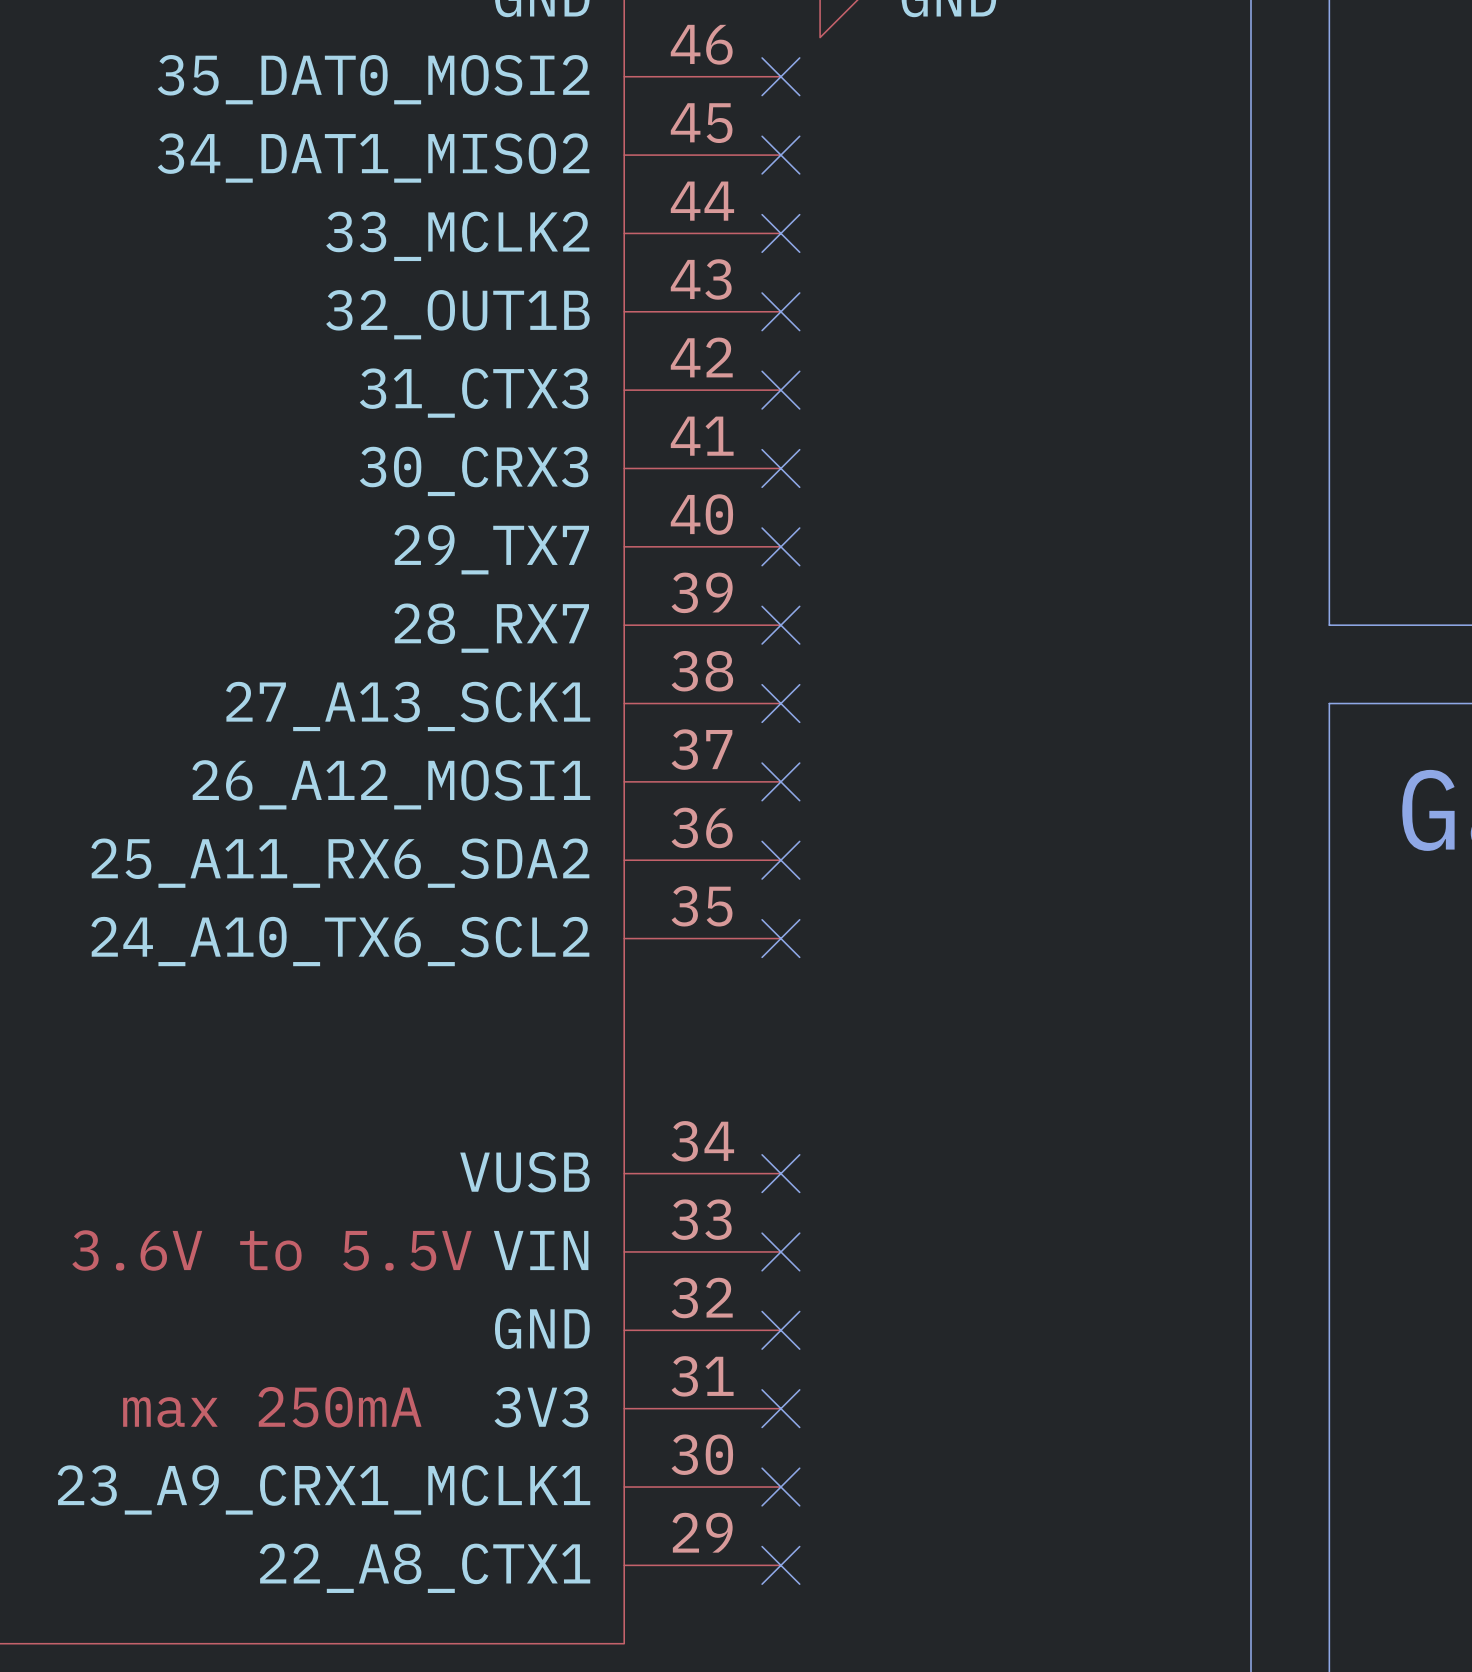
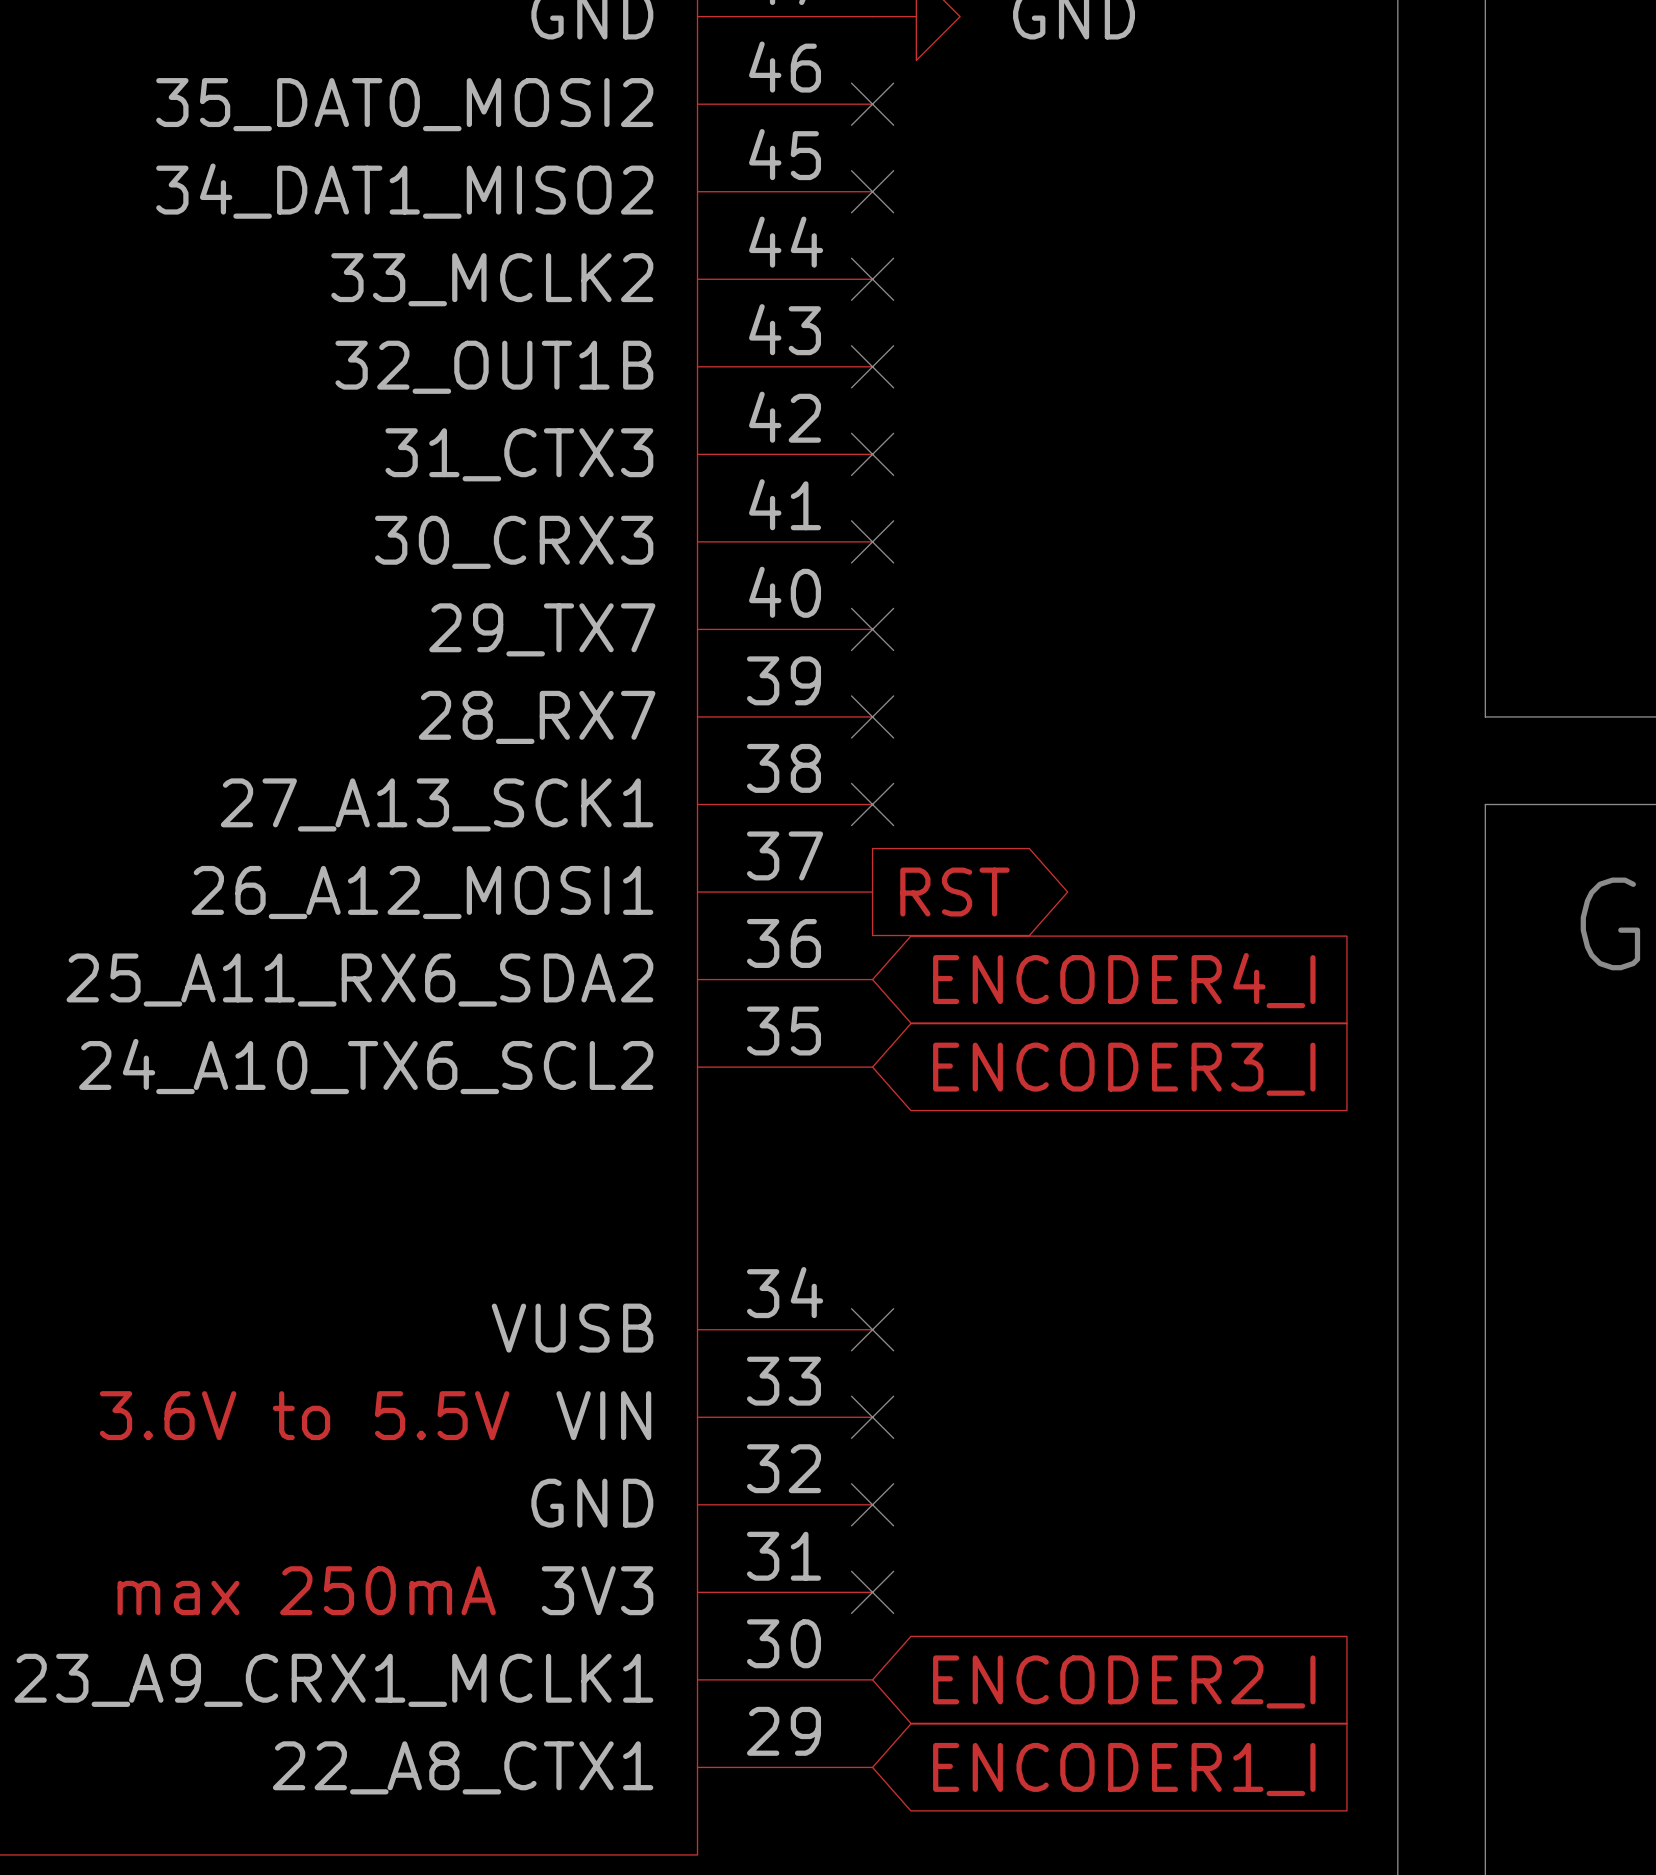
no-connect mark: (780, 781) -> none
global label: none -> RST (954, 892)
no-connect mark: (780, 860) -> none
global label: none -> ENCODER4_I (1124, 980)
no-connect mark: (780, 938) -> none
global label: none -> ENCODER3_I (1124, 1069)
no-connect mark: (780, 1487) -> none
global label: none -> ENCODER2_I (1124, 1681)
no-connect mark: (780, 1565) -> none
global label: none -> ENCODER1_I (1124, 1769)

